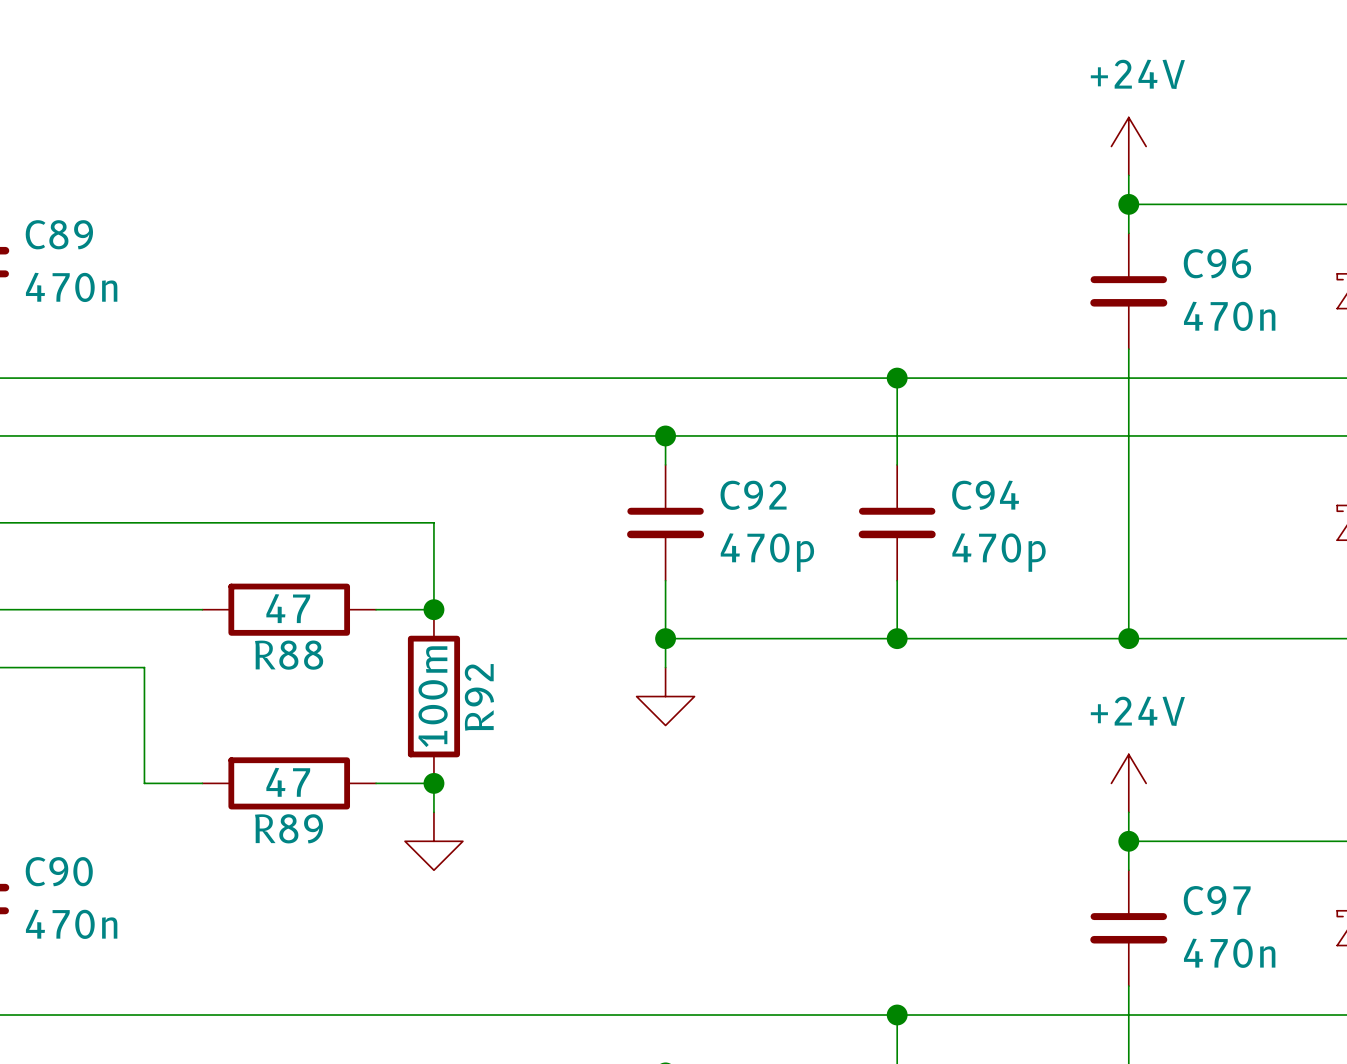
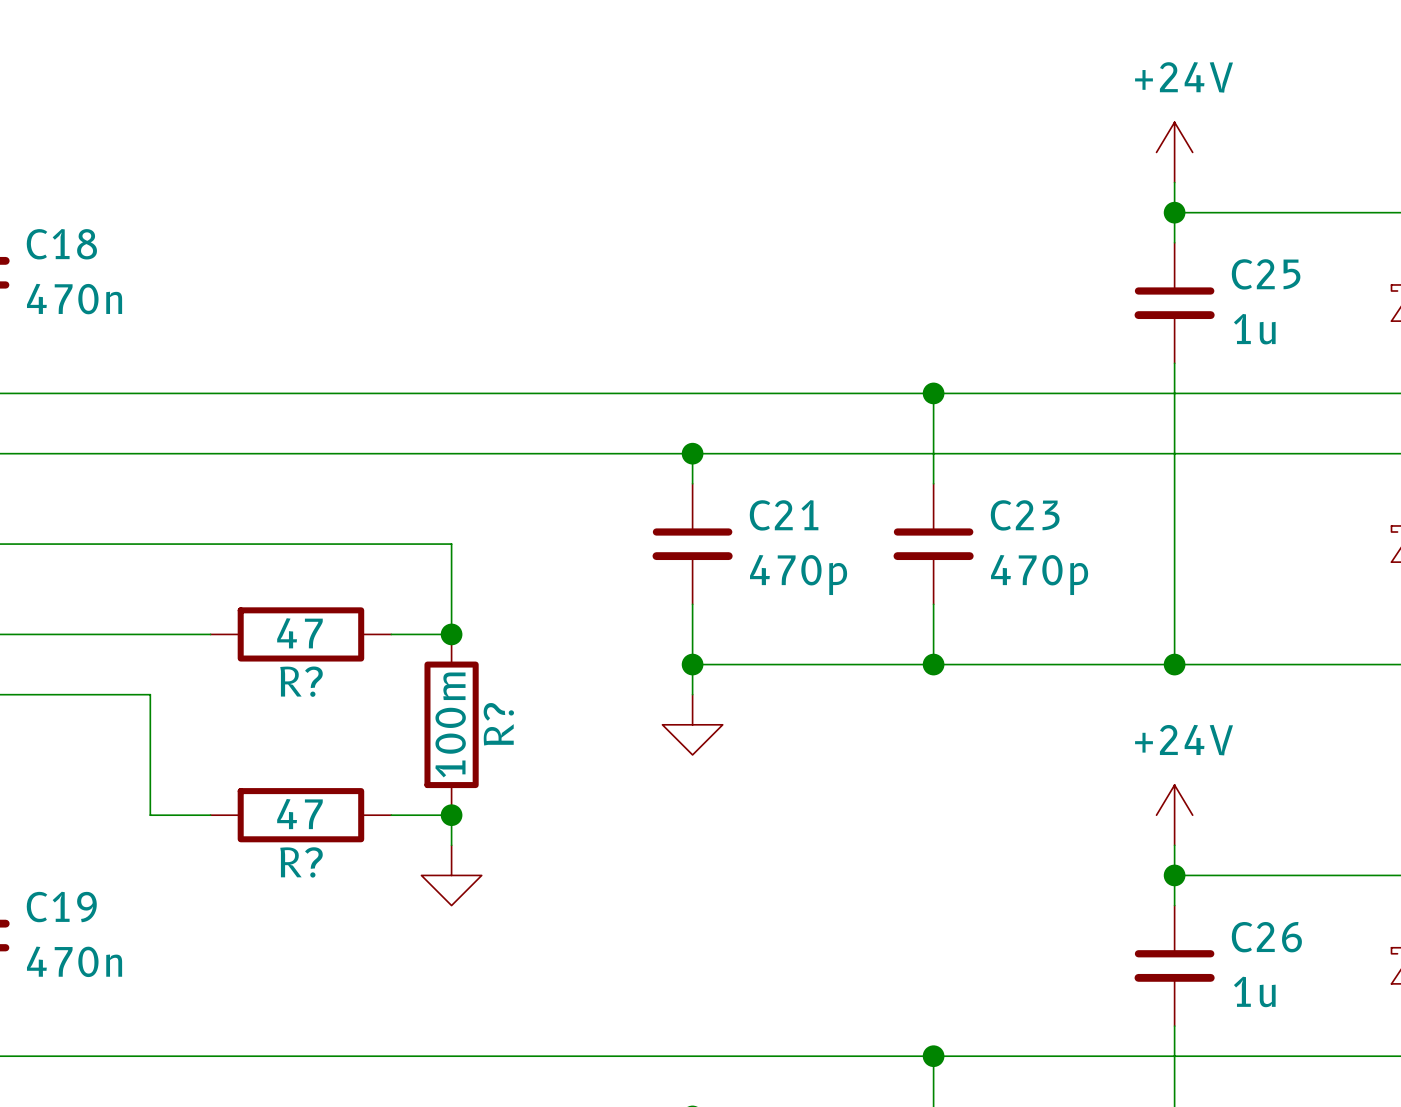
C89 name: C89 (59, 234) -> C18 (61, 244)
C96 name: C96 (1217, 263) -> C25 (1266, 274)
C96 value: 470n (1229, 316) -> 1u (1254, 329)
C92 name: C92 (753, 495) -> C21 (784, 515)
C94 name: C94 (985, 495) -> C23 (1025, 515)
R88 name: R88 (289, 655) -> R? (301, 681)
R92 name: R92 (479, 697) -> R? (498, 724)
R89 name: R89 (288, 828) -> R? (301, 862)
C90 name: C90 (59, 871) -> C19 (61, 907)
C97 name: C97 (1217, 900) -> C26 (1266, 937)
C97 value: 470n (1229, 953) -> 1u (1254, 991)

